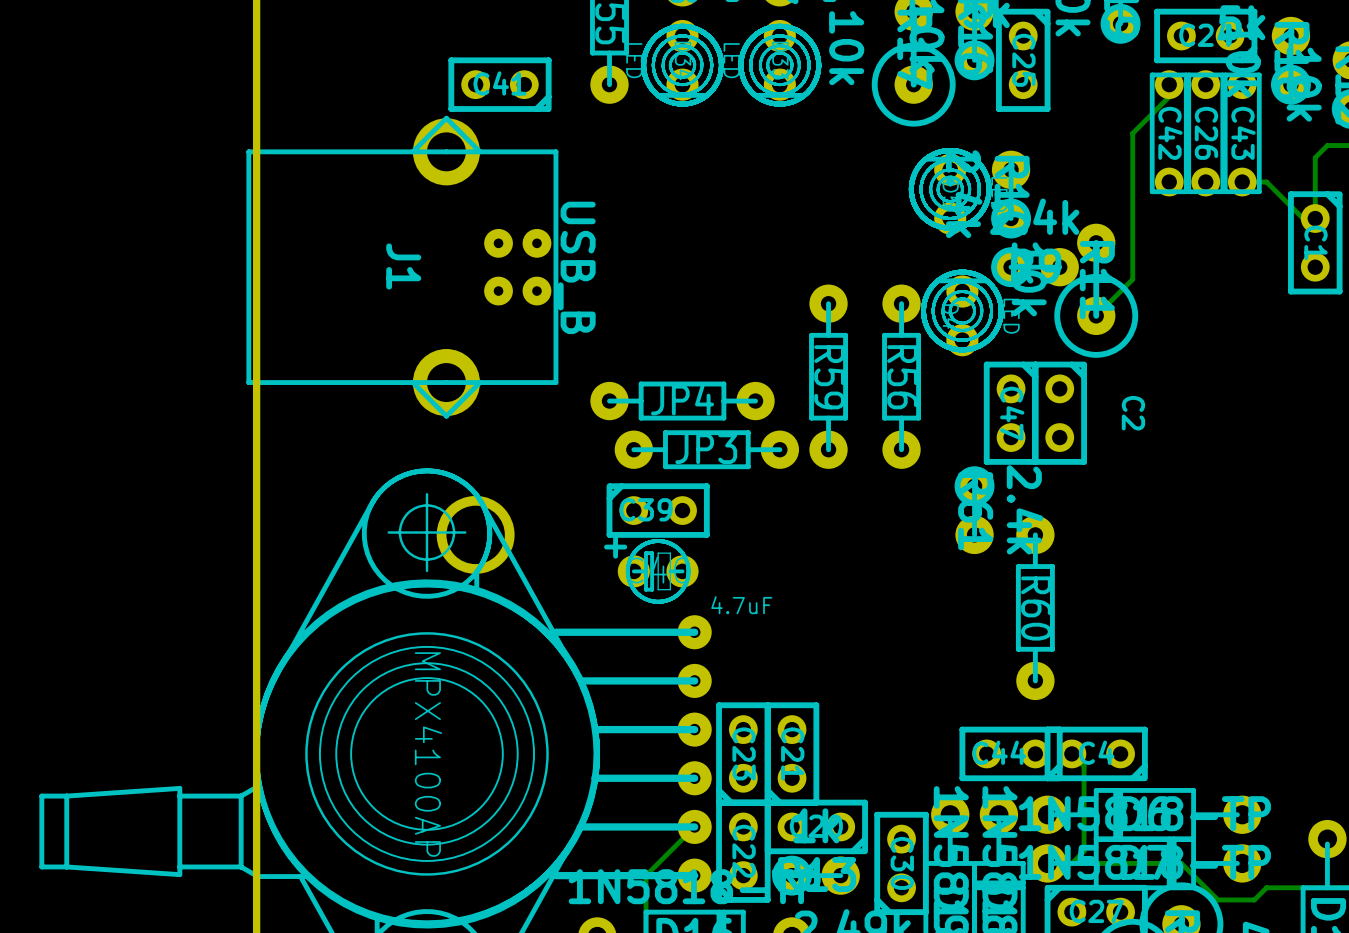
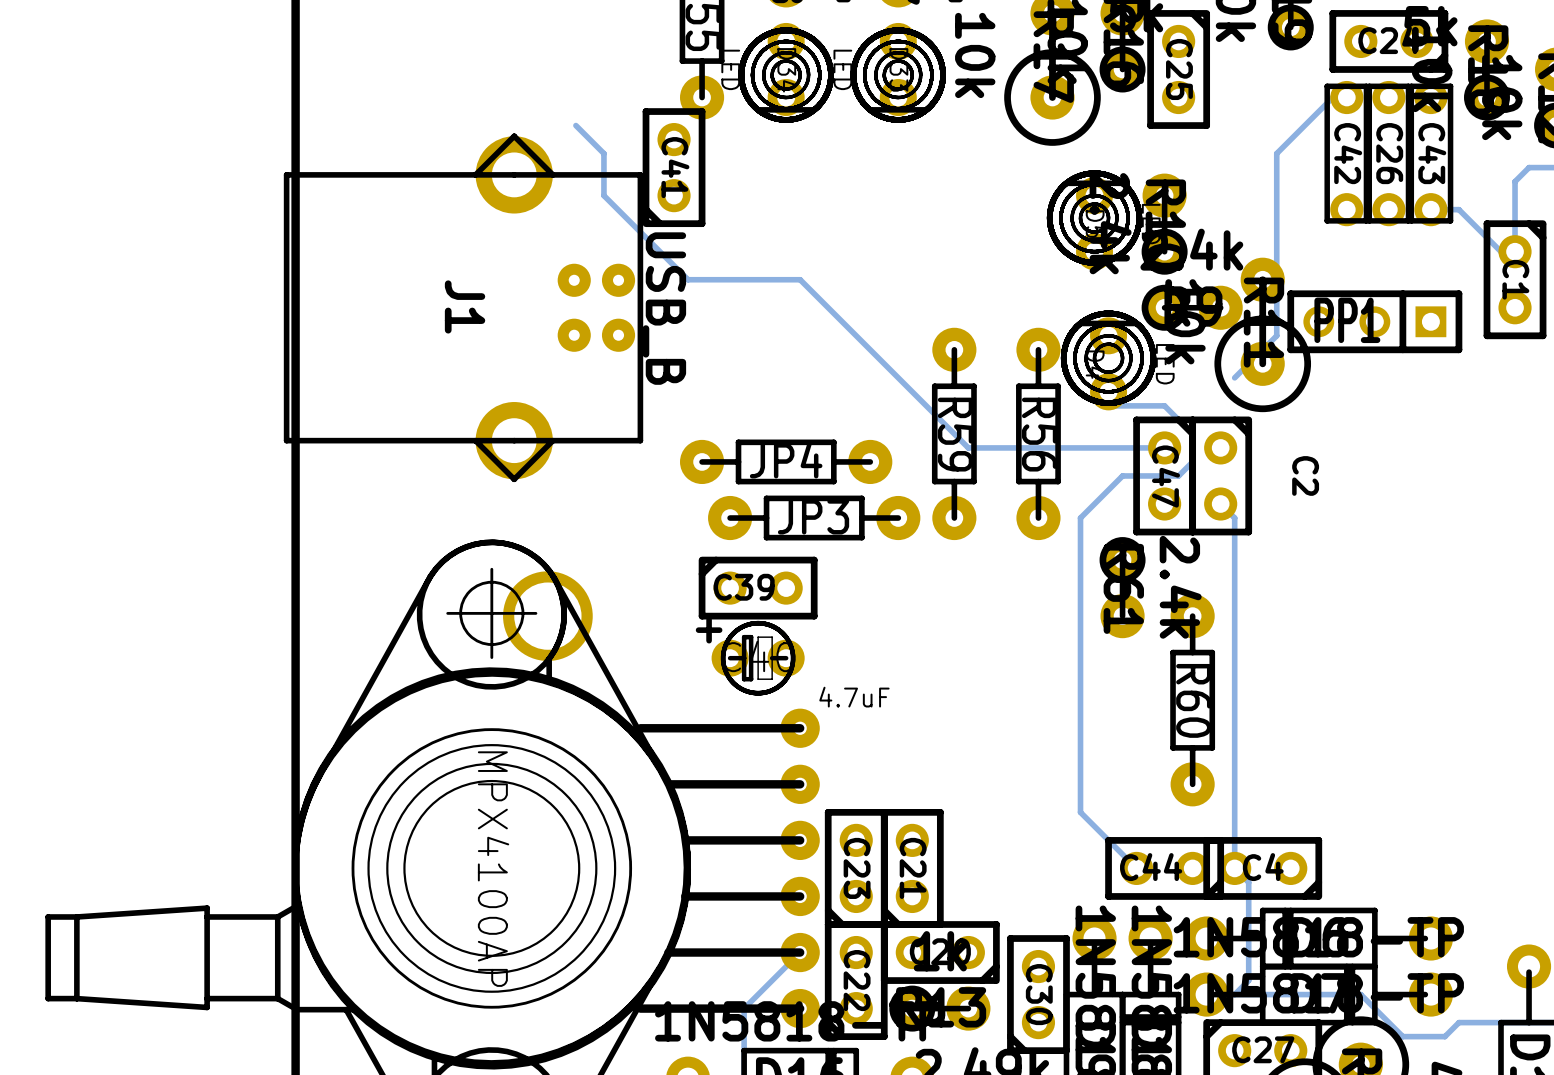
C41 rotation: 0° (499, 84) -> 90° clockwise (674, 167)
C41 position: (499, 84) -> (674, 167)
track: (1169, 84) (1169, 96) (1132, 133) (1132, 279) (1096, 315) -> (1346, 97) (1332, 97) (1276, 153) (1276, 335) (1234, 377)
track: none -> (575, 125) (603, 153) (603, 195) (688, 279) (800, 279) (968, 447) (1164, 447)
PP1: none -> (1374, 321)
track: none -> (1108, 405) (1164, 405) (1192, 433) (1192, 461) (1178, 475) (1122, 475) (1080, 518) (1080, 812) (1136, 868)
track: none -> (1220, 504) (1234, 518) (1234, 868)

